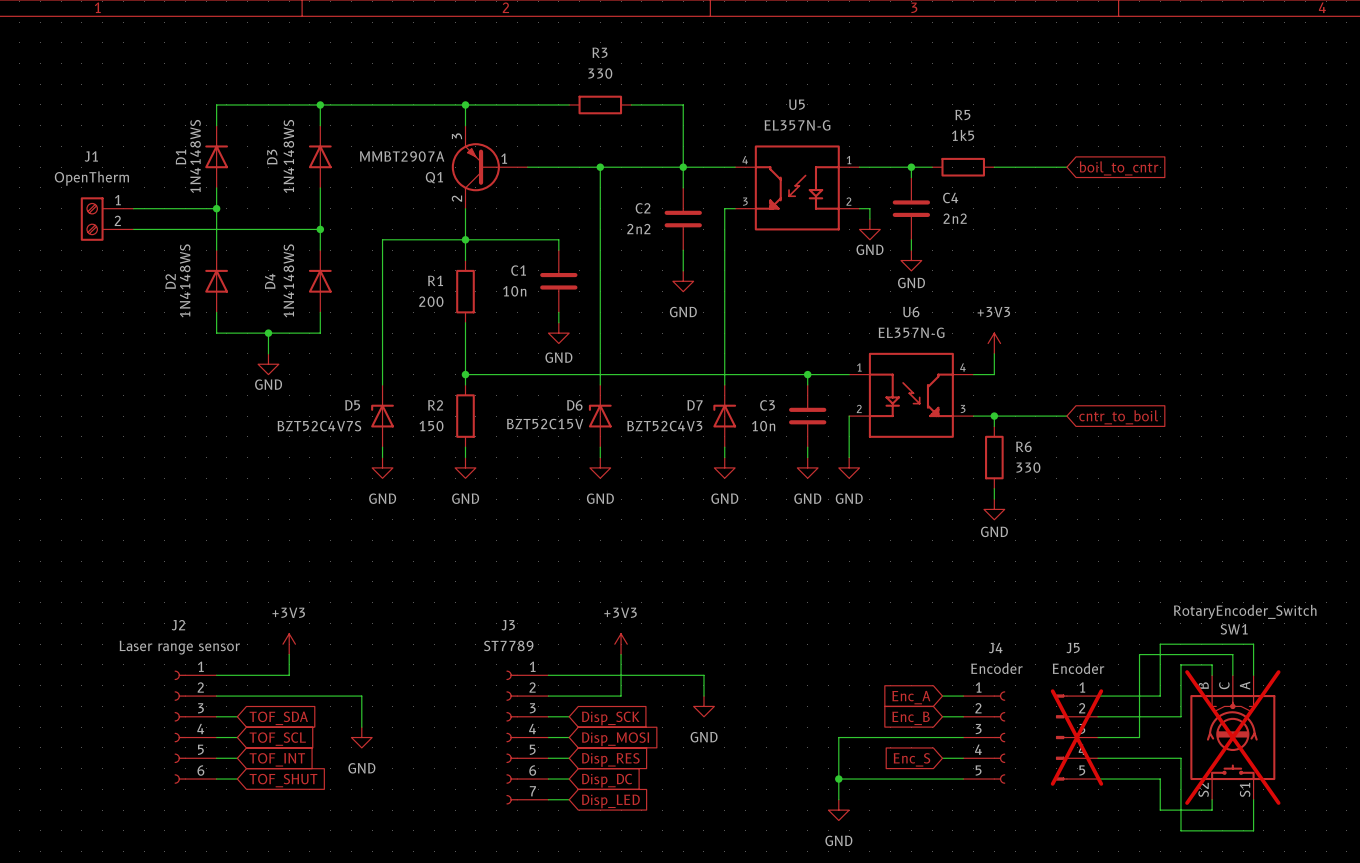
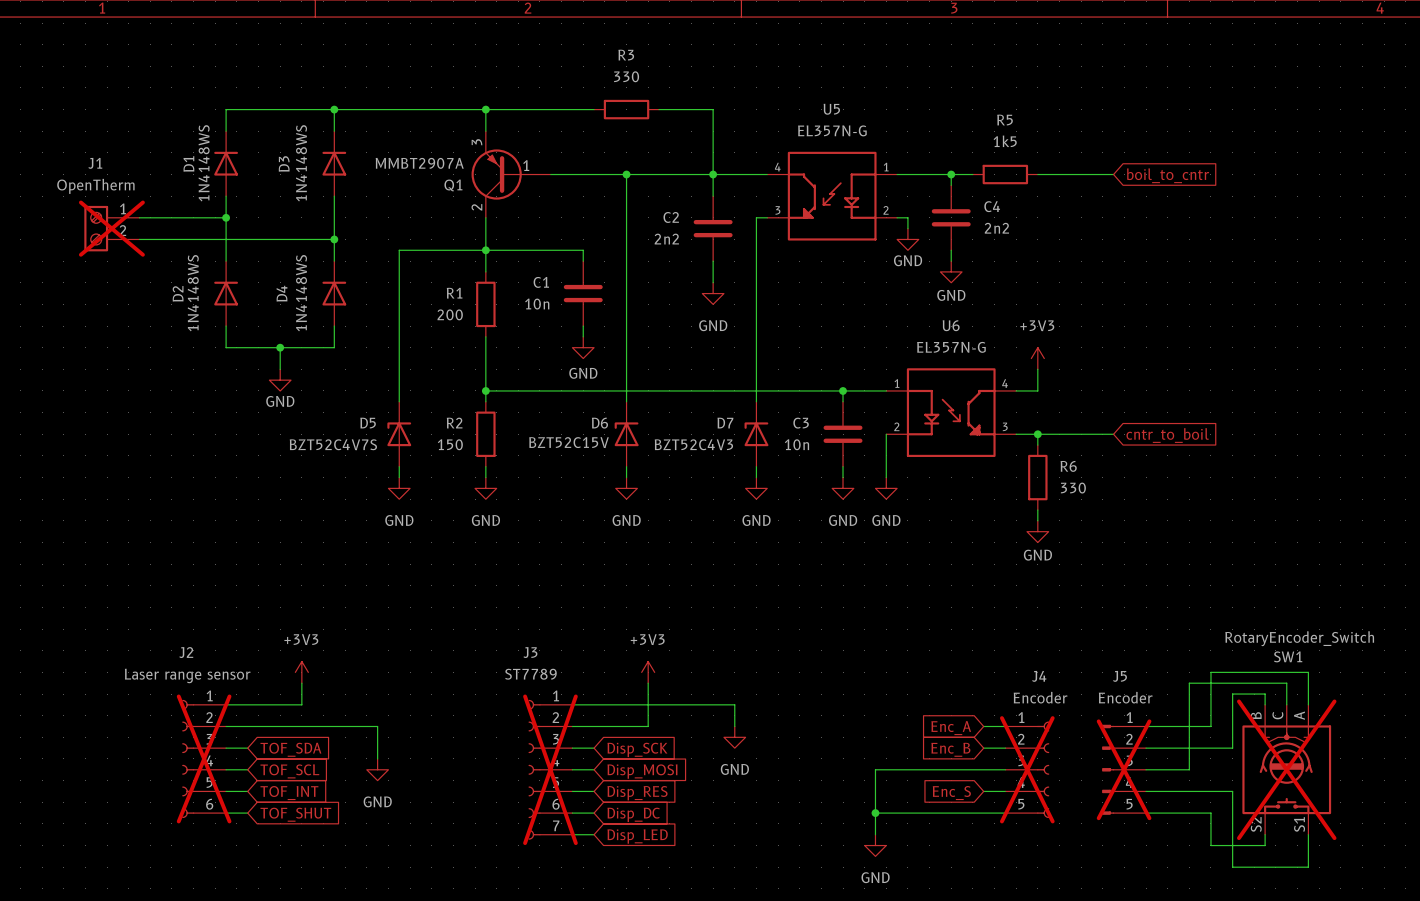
J1 do-not-place cross: none -> (111, 228)
J2 do-not-place cross: none -> (204, 758)
J3 do-not-place cross: none -> (550, 769)
J4 do-not-place cross: none -> (1027, 769)

